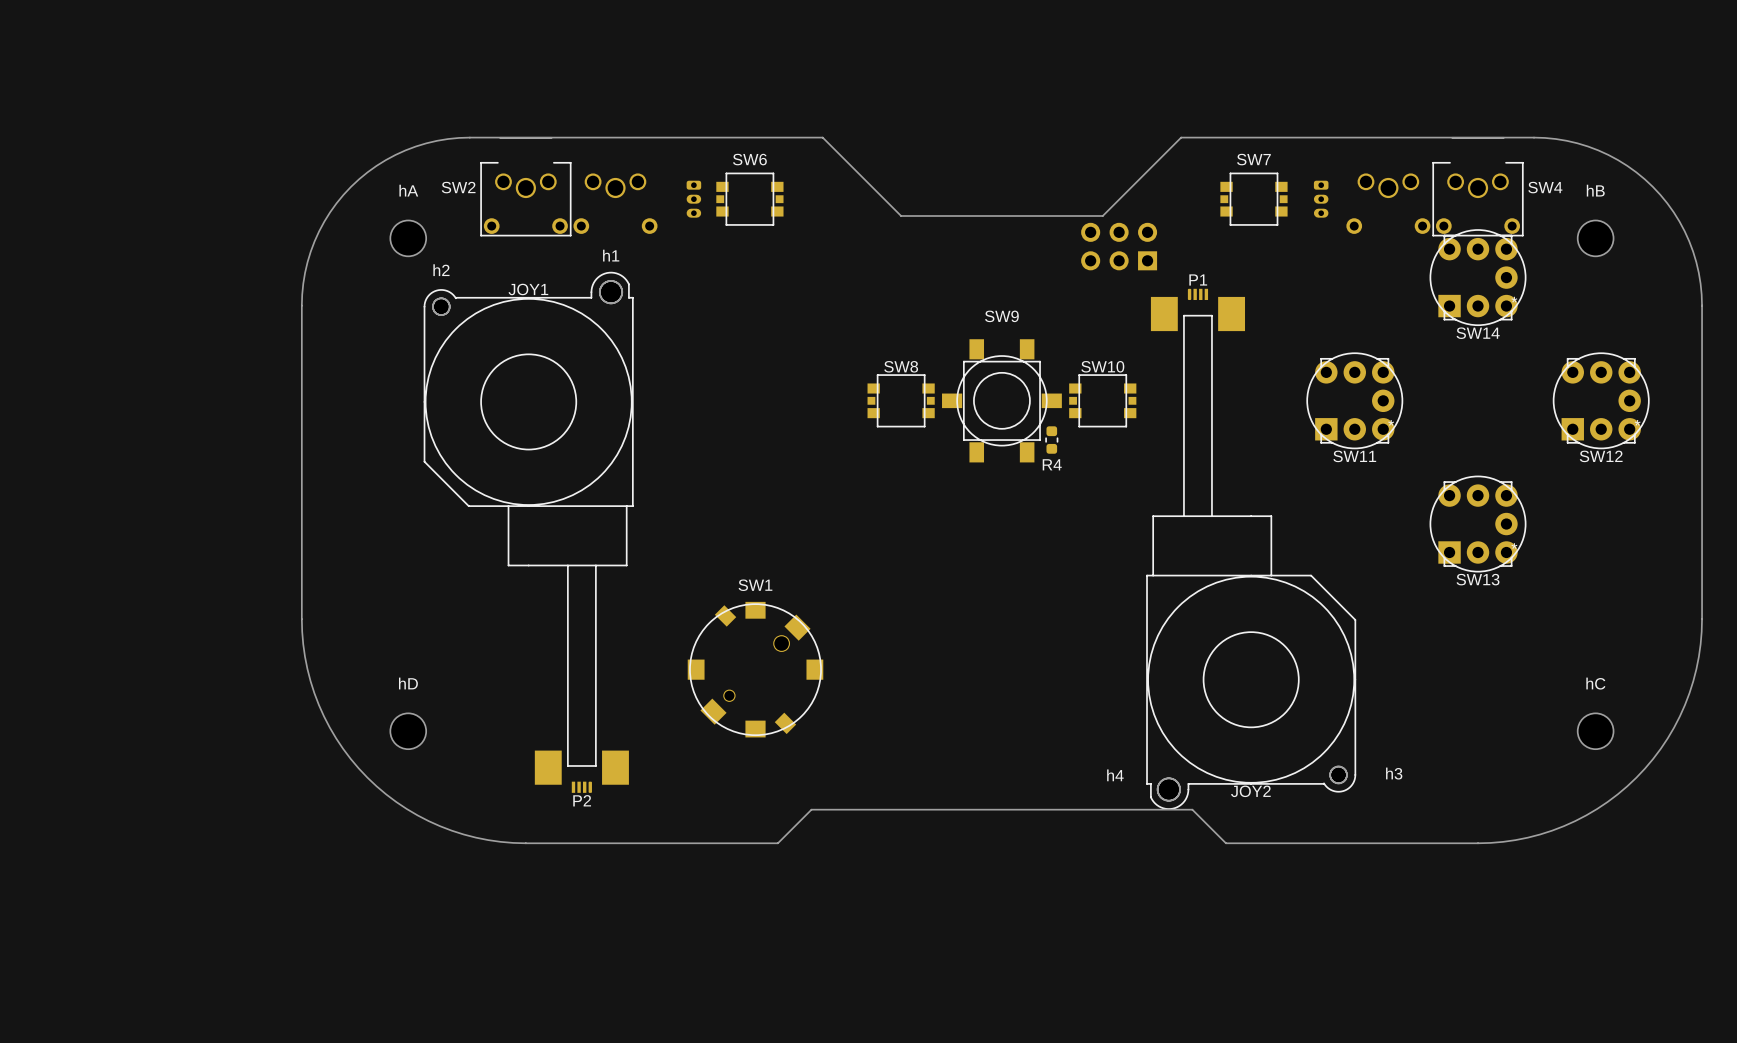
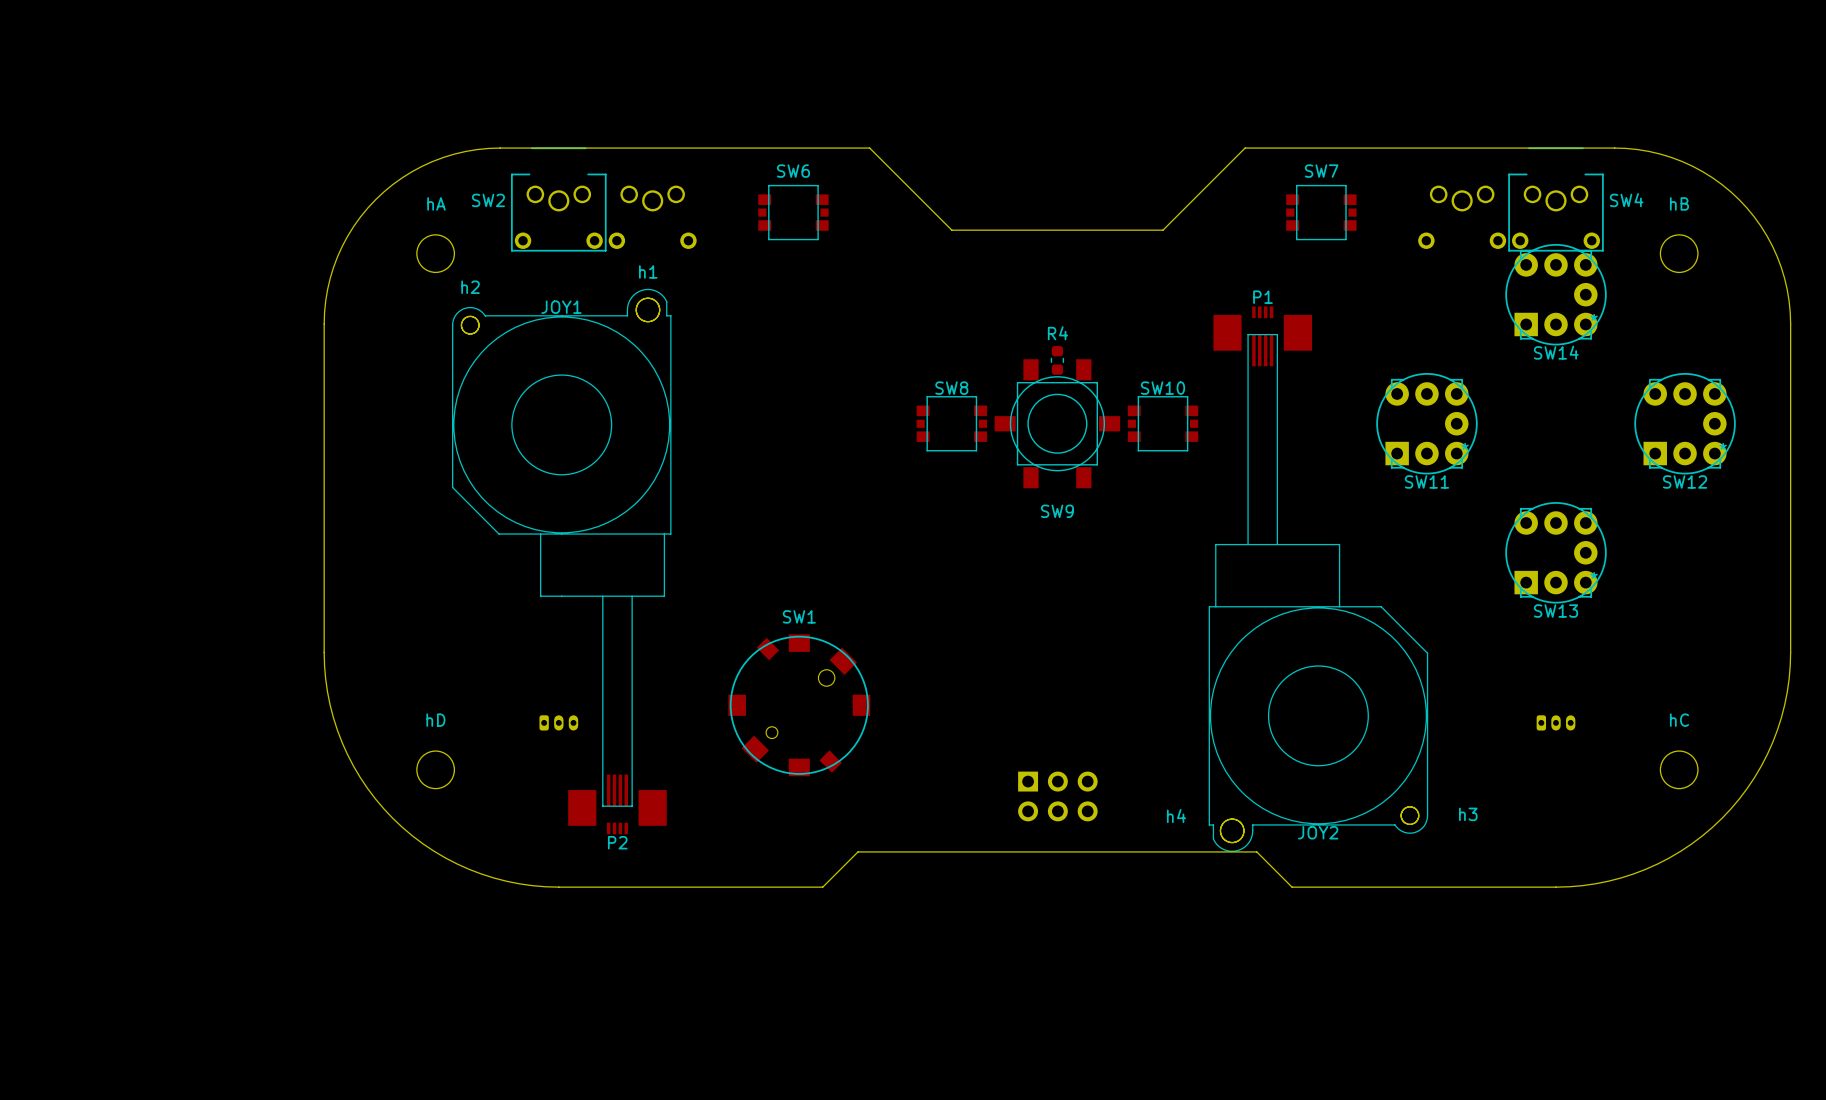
part: (693, 199) -> none
part: (1321, 199) -> none
part: (1119, 246) -> none
JOY1 footprint: [423, 272, 634, 767] -> [452, 288, 672, 807]
JOY2 footprint: [1146, 315, 1356, 810] -> [1208, 334, 1429, 852]
SW9 name position: SW9 (1001, 316) -> SW9 (1057, 511)
R4 position: (1051, 440) -> (1057, 360)
R4 name position: R4 (1052, 464) -> R4 (1057, 333)
part: none -> (558, 722)
part: none -> (1556, 722)
part: none -> (1057, 796)

